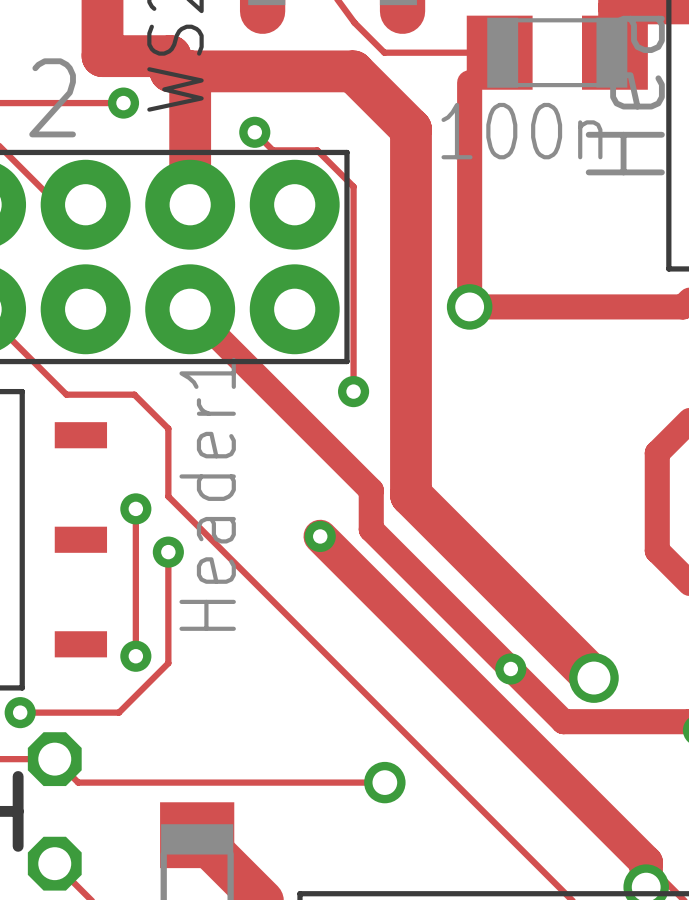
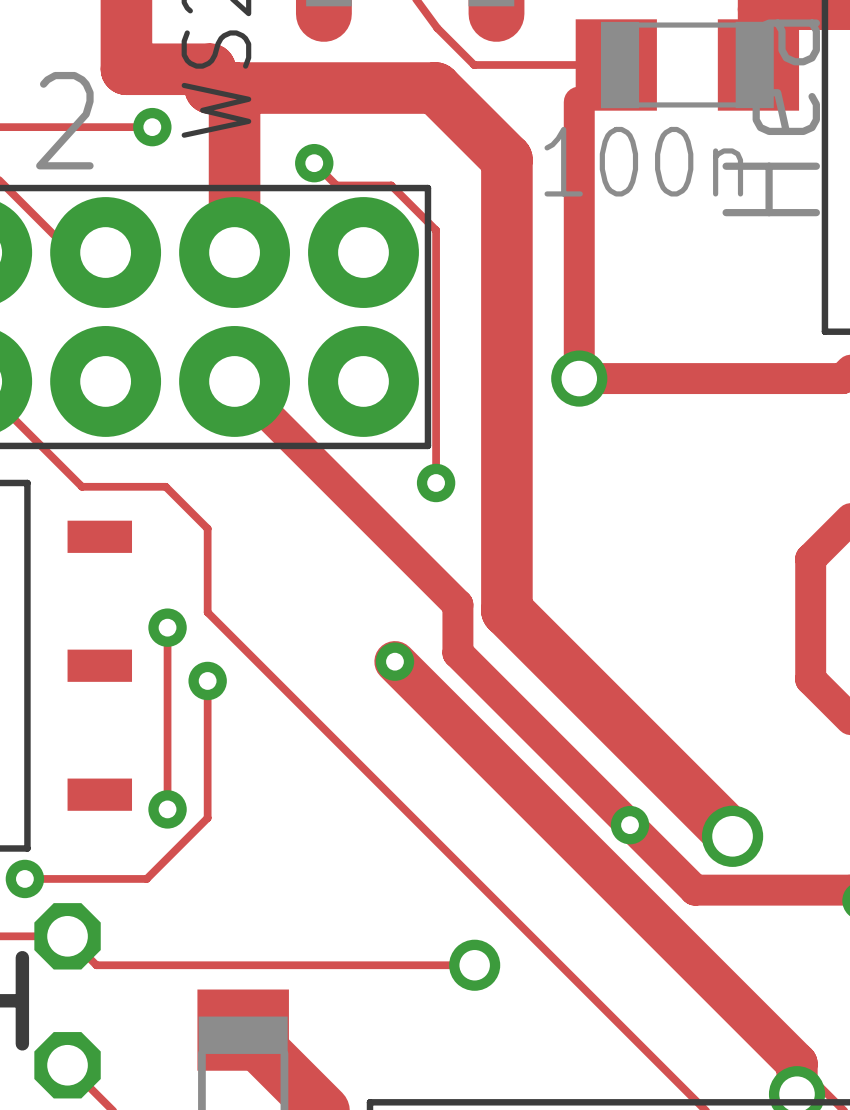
text: Header1 (207, 494) -> none

